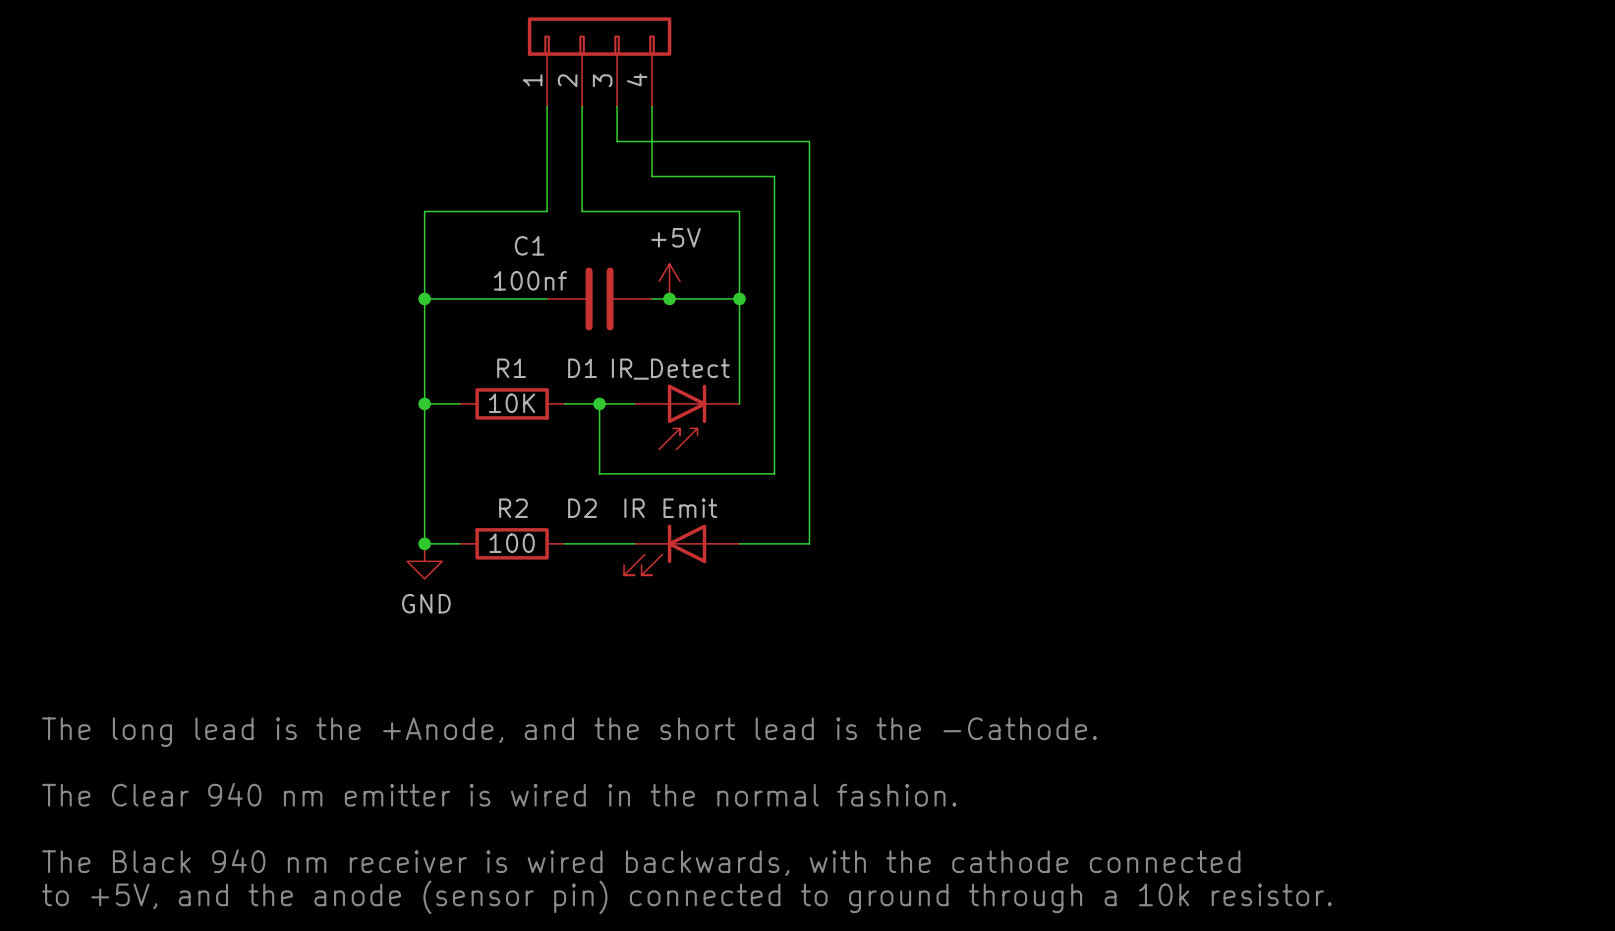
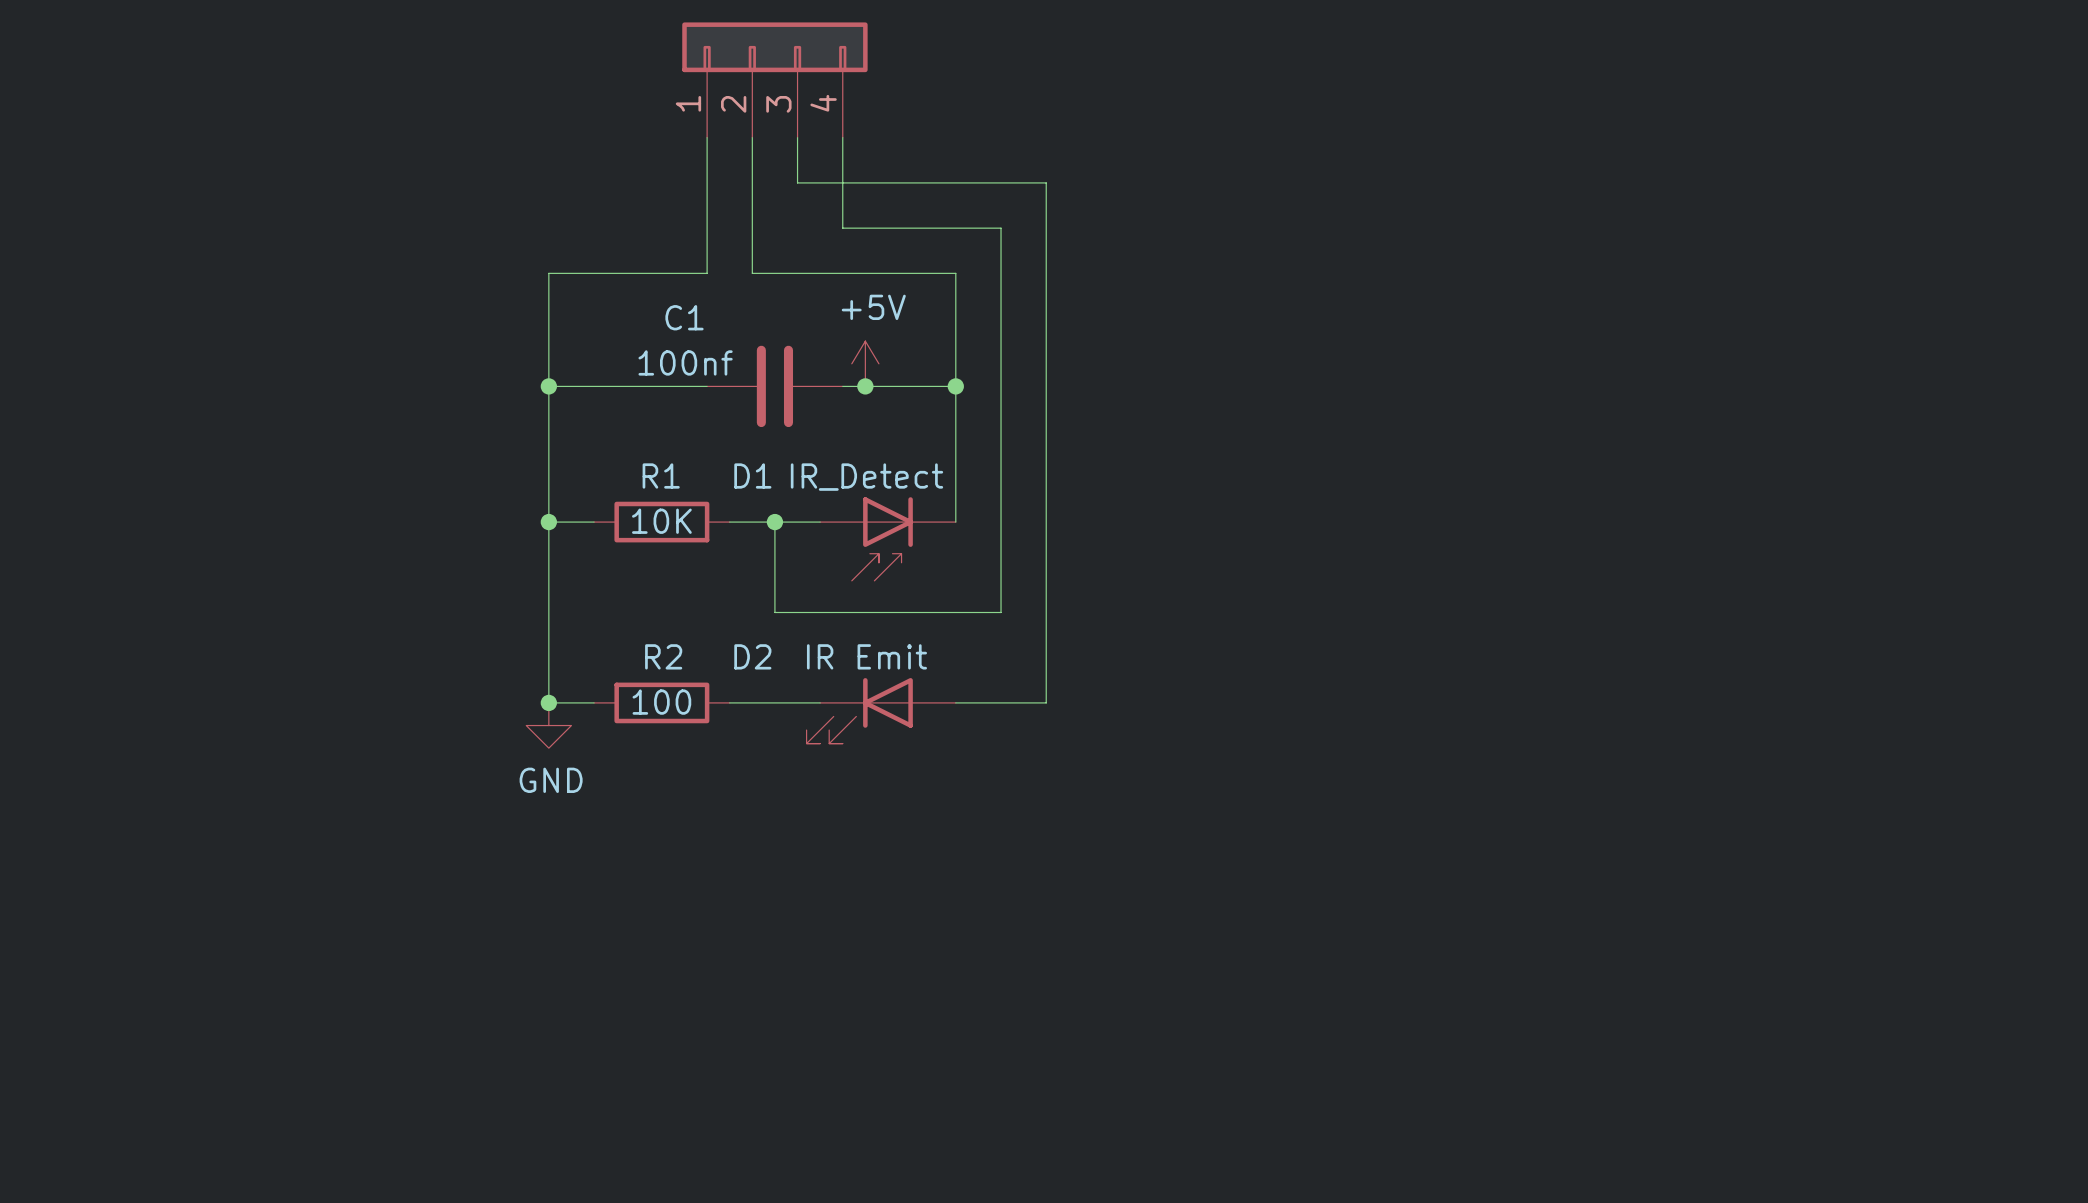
text: The long lead is the +Anode, and the short lead is the -Cathode. (569, 732) -> none
text: The Clear 940 nm emitter is wired in the normal fashion. (499, 794) -> none
text: The Black 940 nm receiver is wired backwards, with the cathode connected (641, 862) -> none
text: to +5V, and the anode (sensor pin) connected to ground through a 10k resistor. (686, 897) -> none

